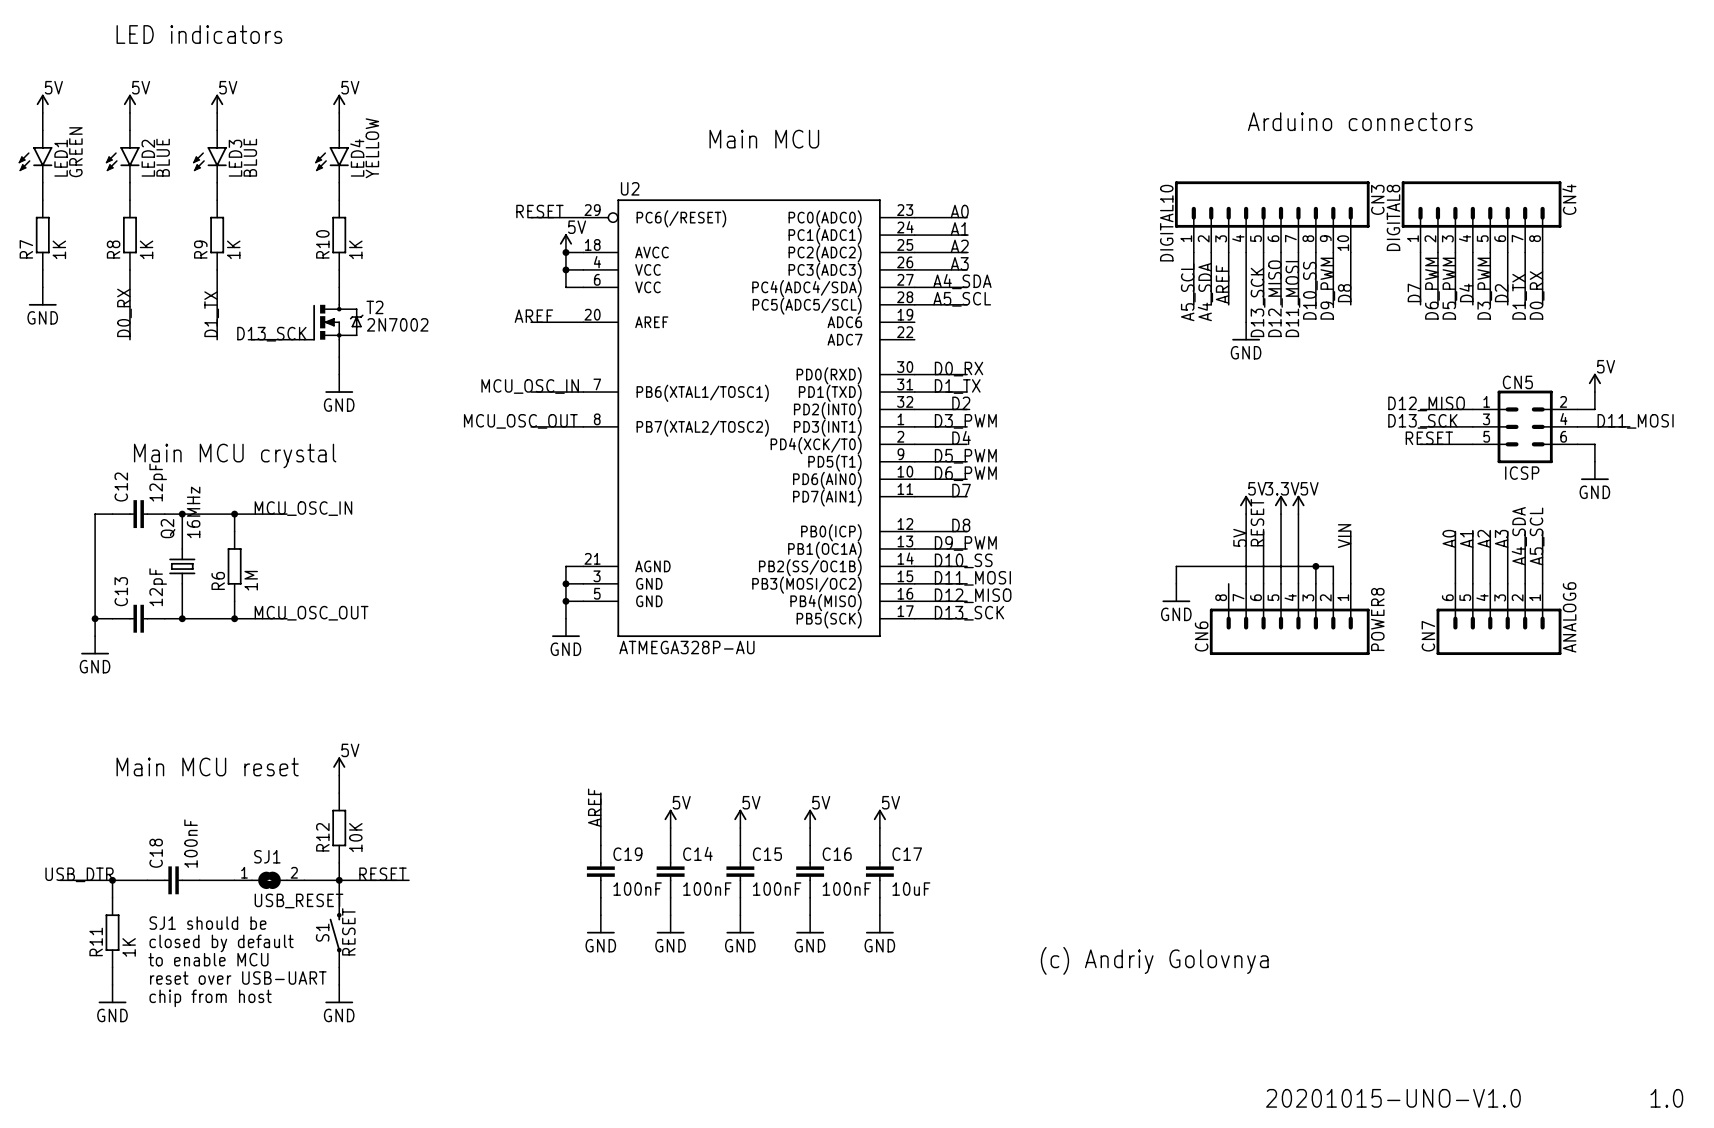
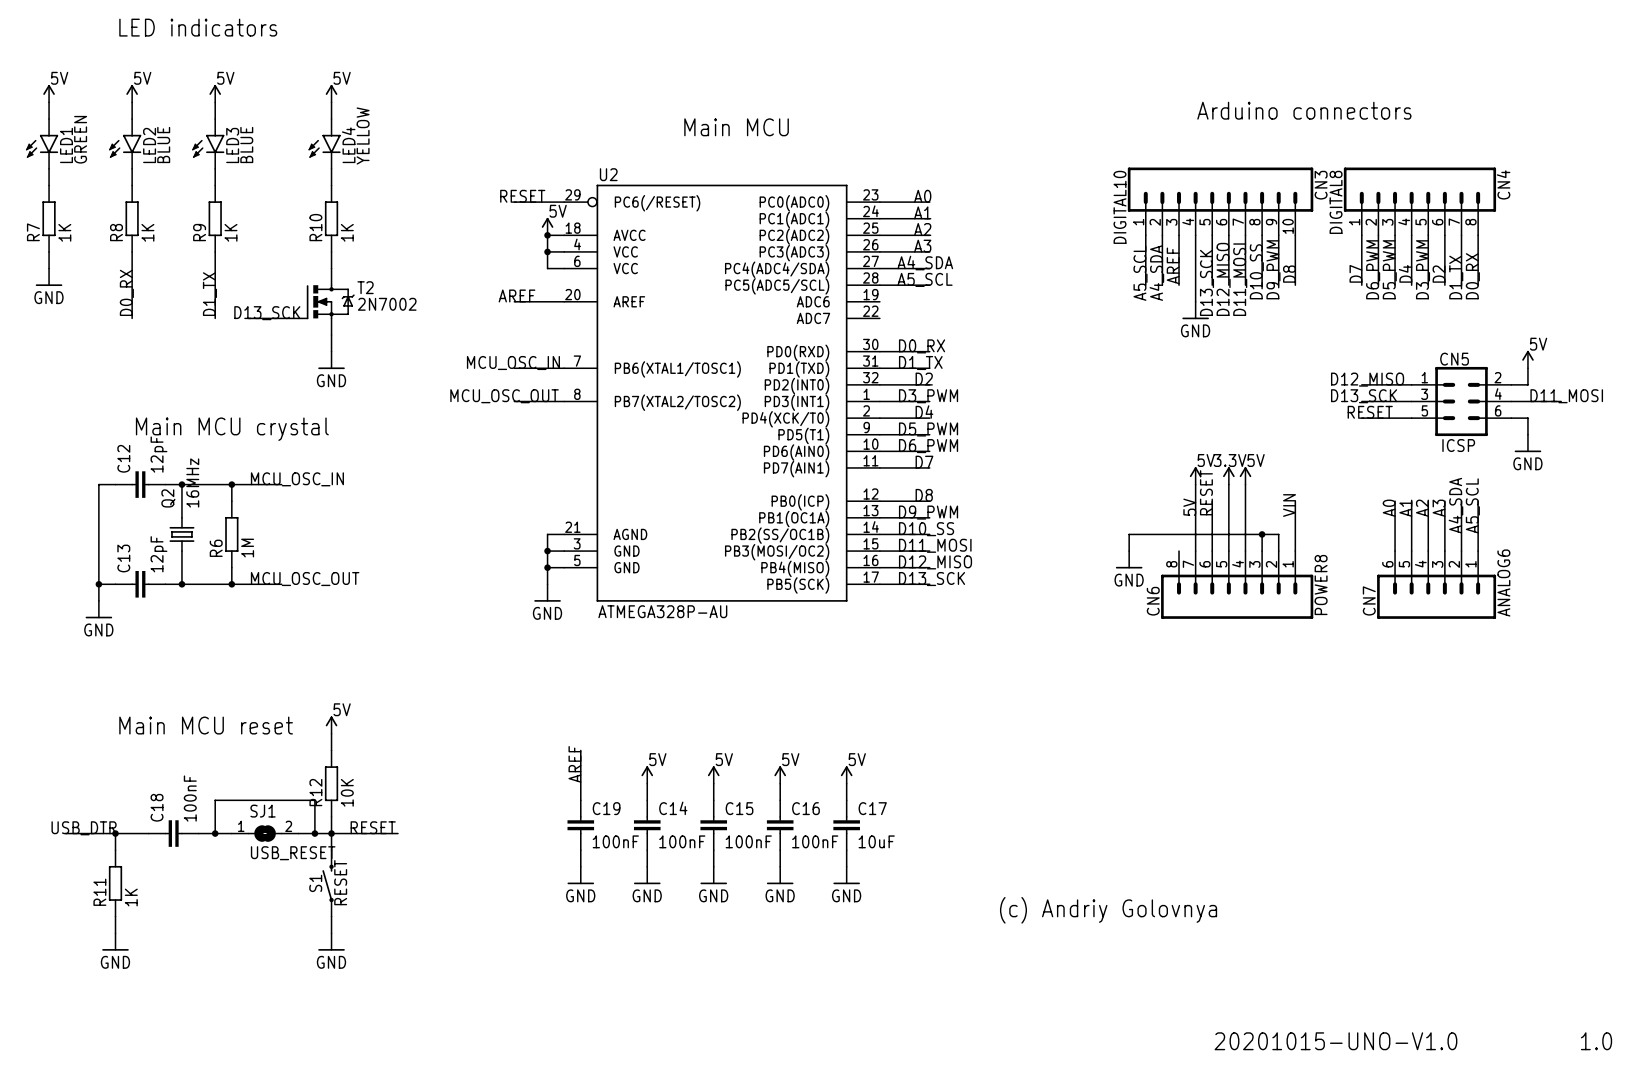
wire: none -> (215, 833) (215, 800) (314, 800) (314, 833)
junction: none -> (215, 833)
junction: none -> (314, 833)
text: SJ1 should be (207, 923) -> none
text: closed by default (221, 943) -> none
text: to enable MCU (208, 959) -> none
text: reset over USB-UART (238, 978) -> none
text: chip from host (210, 998) -> none

